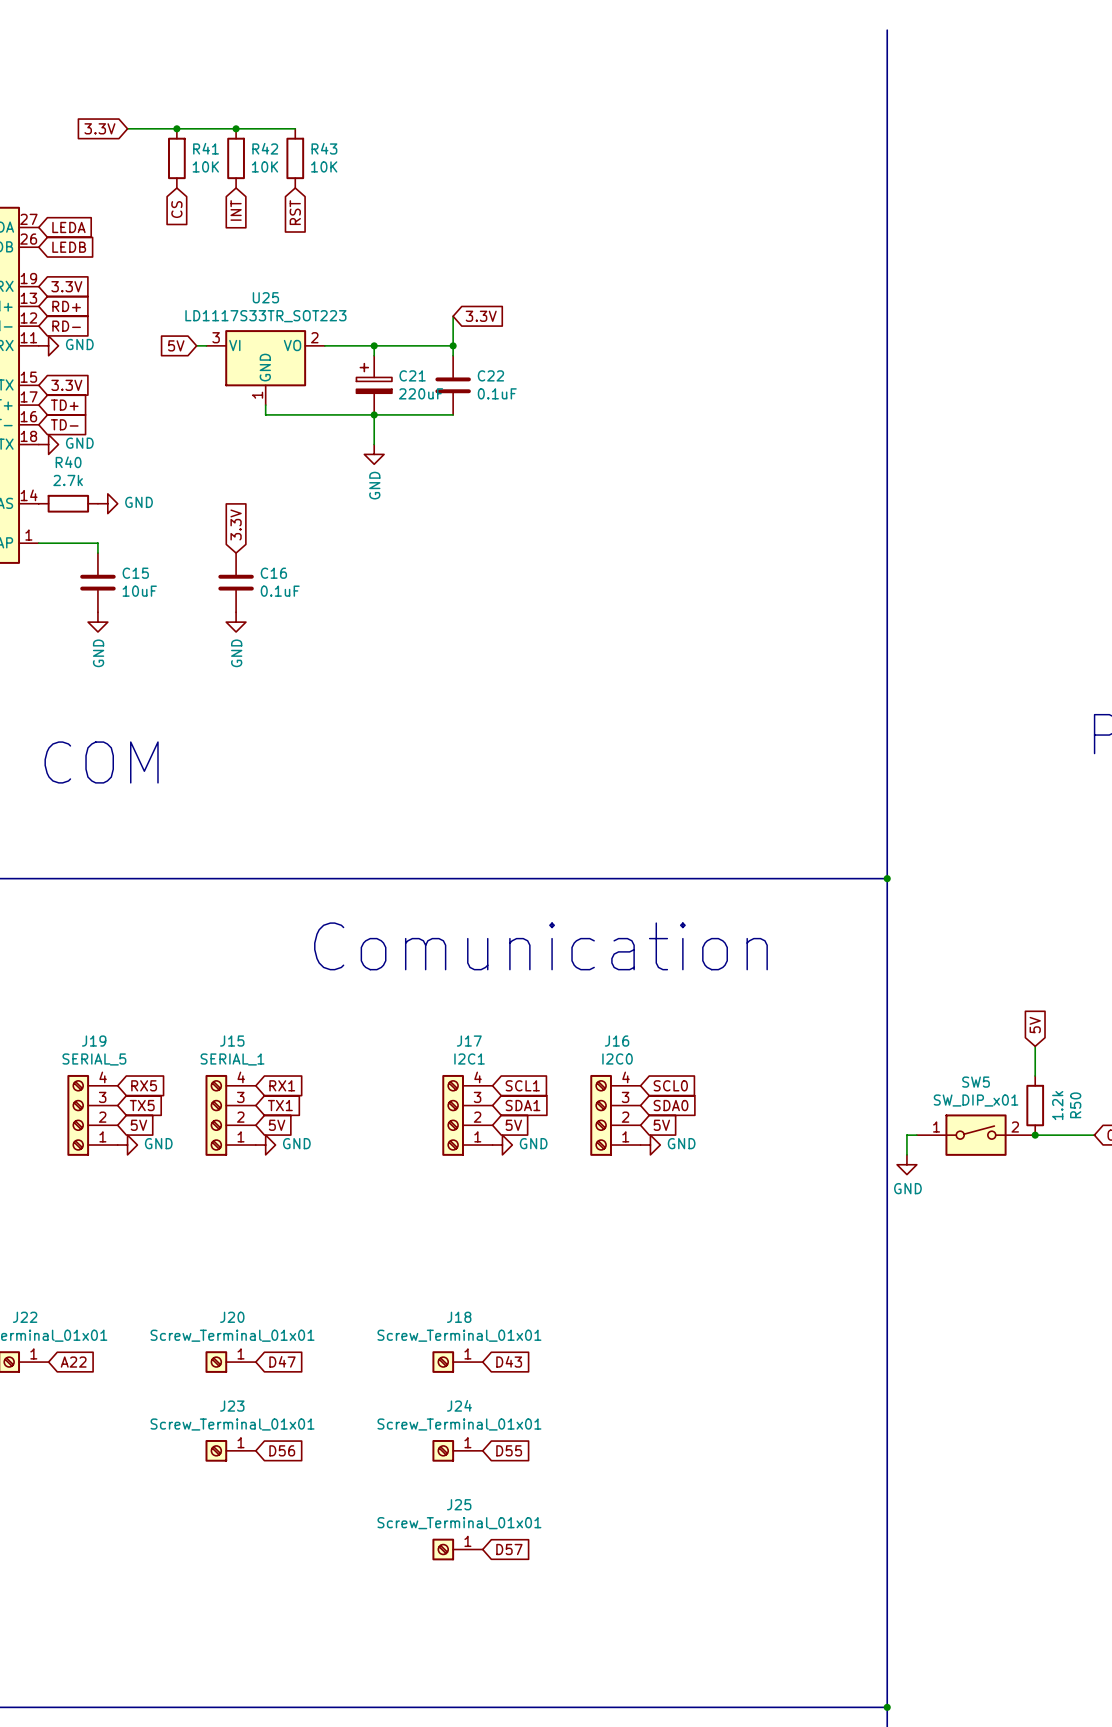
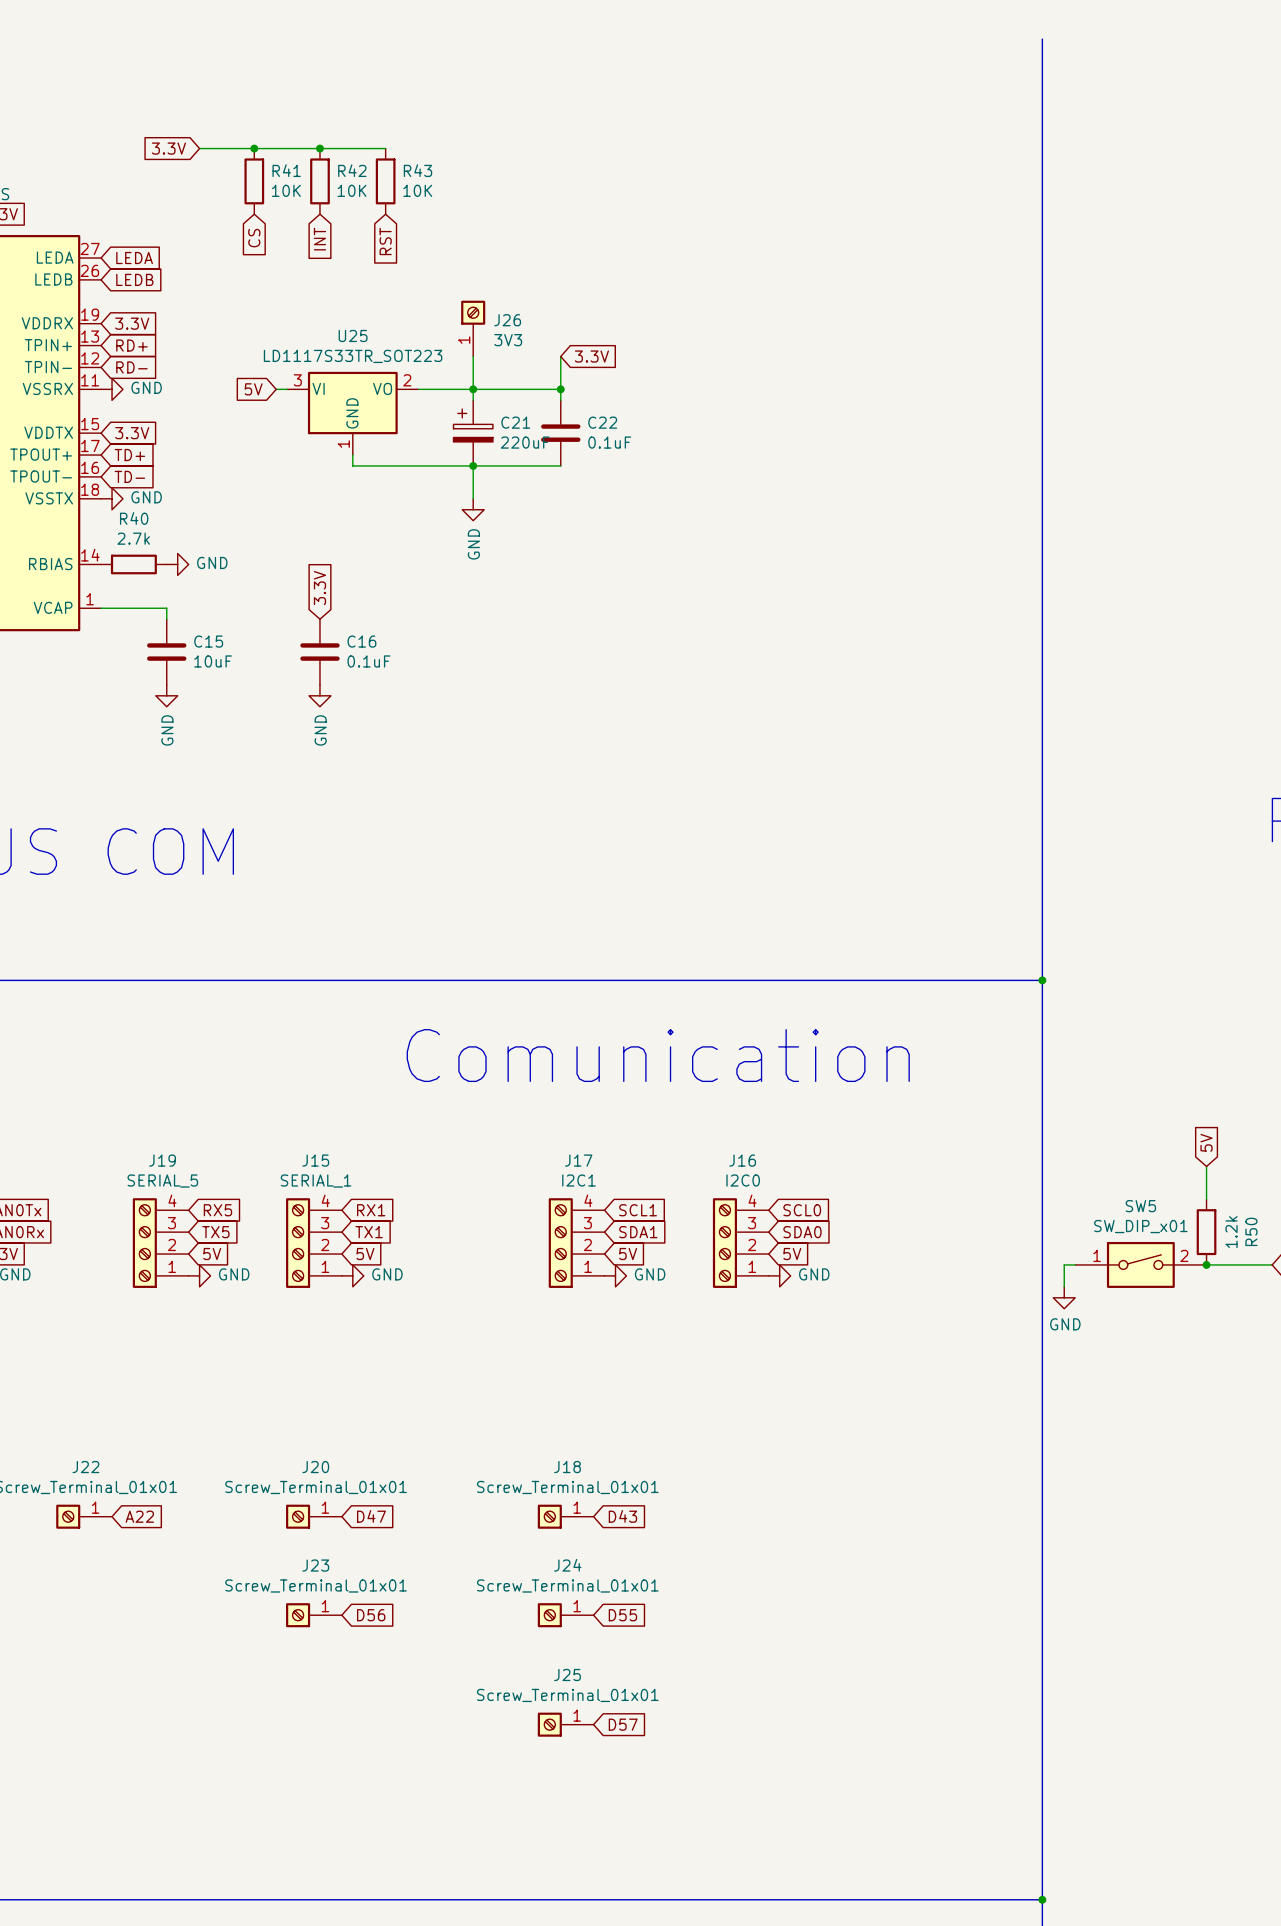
J26: none -> 3V3 (473, 328)
wire: none -> (473, 356) (473, 389)

